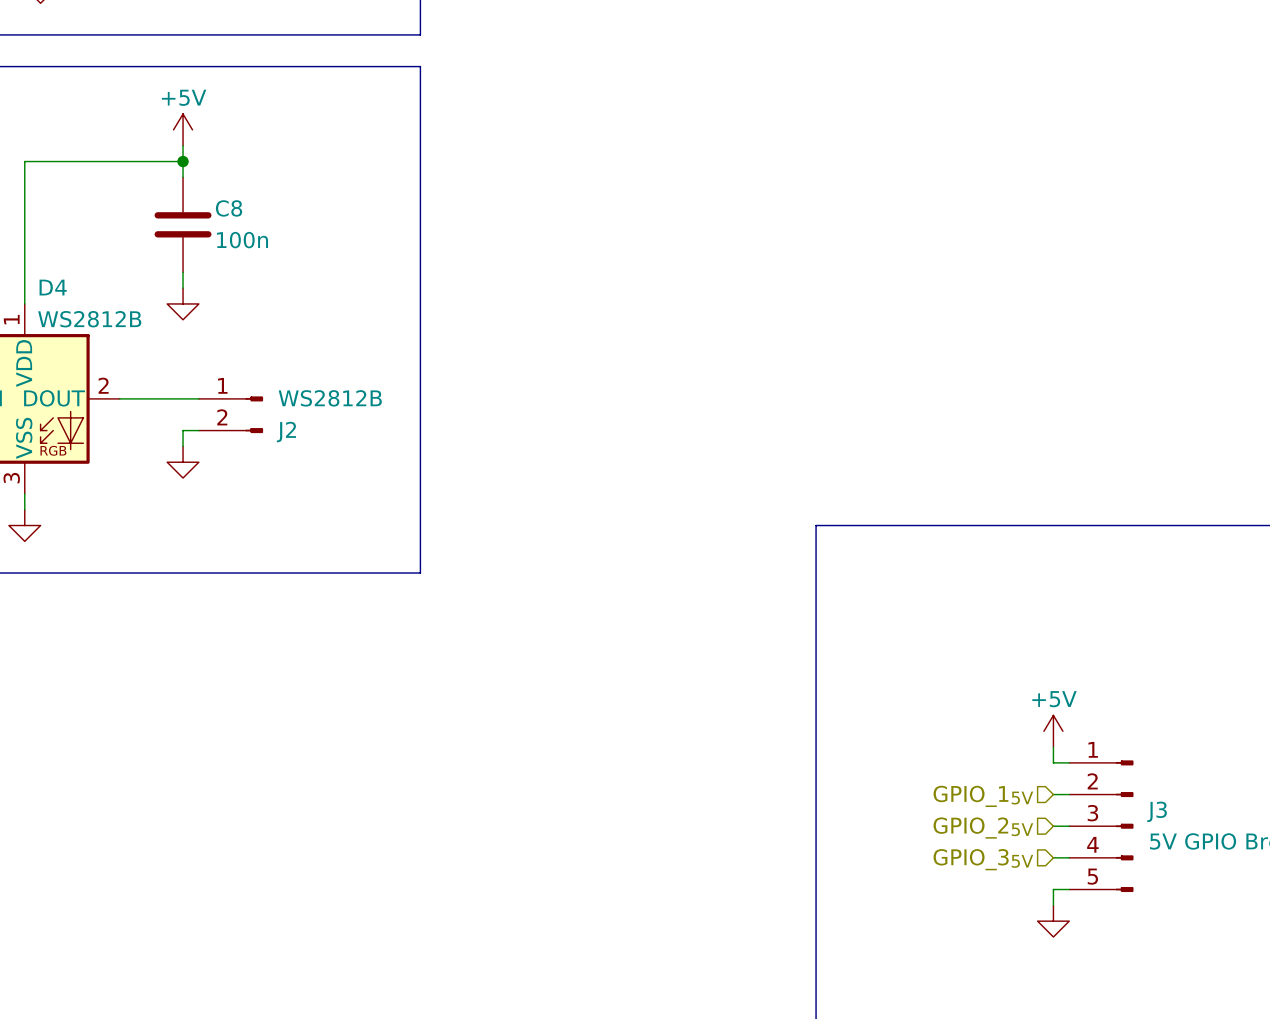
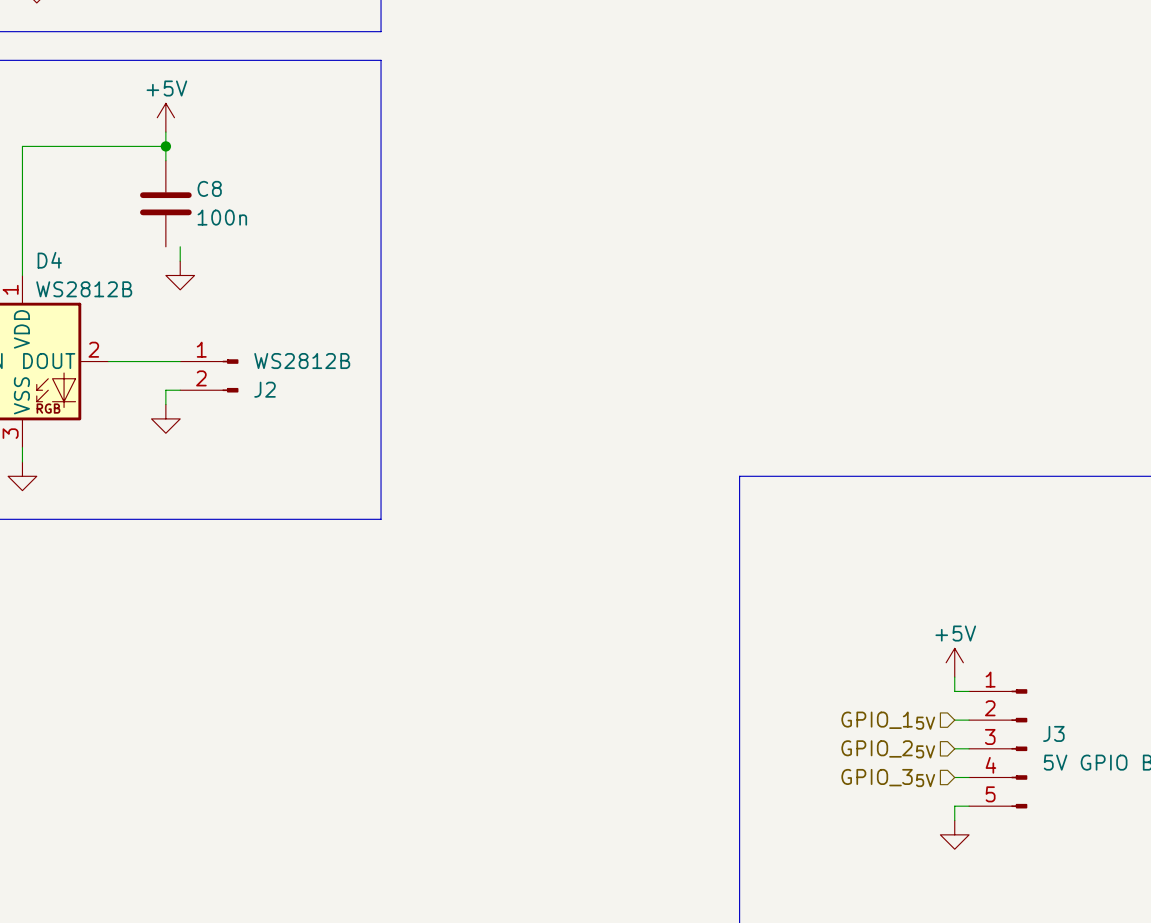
wire: (183, 272) (183, 288) -> (180, 246) (180, 261)
power symbol position: (183, 303) -> (180, 275)

